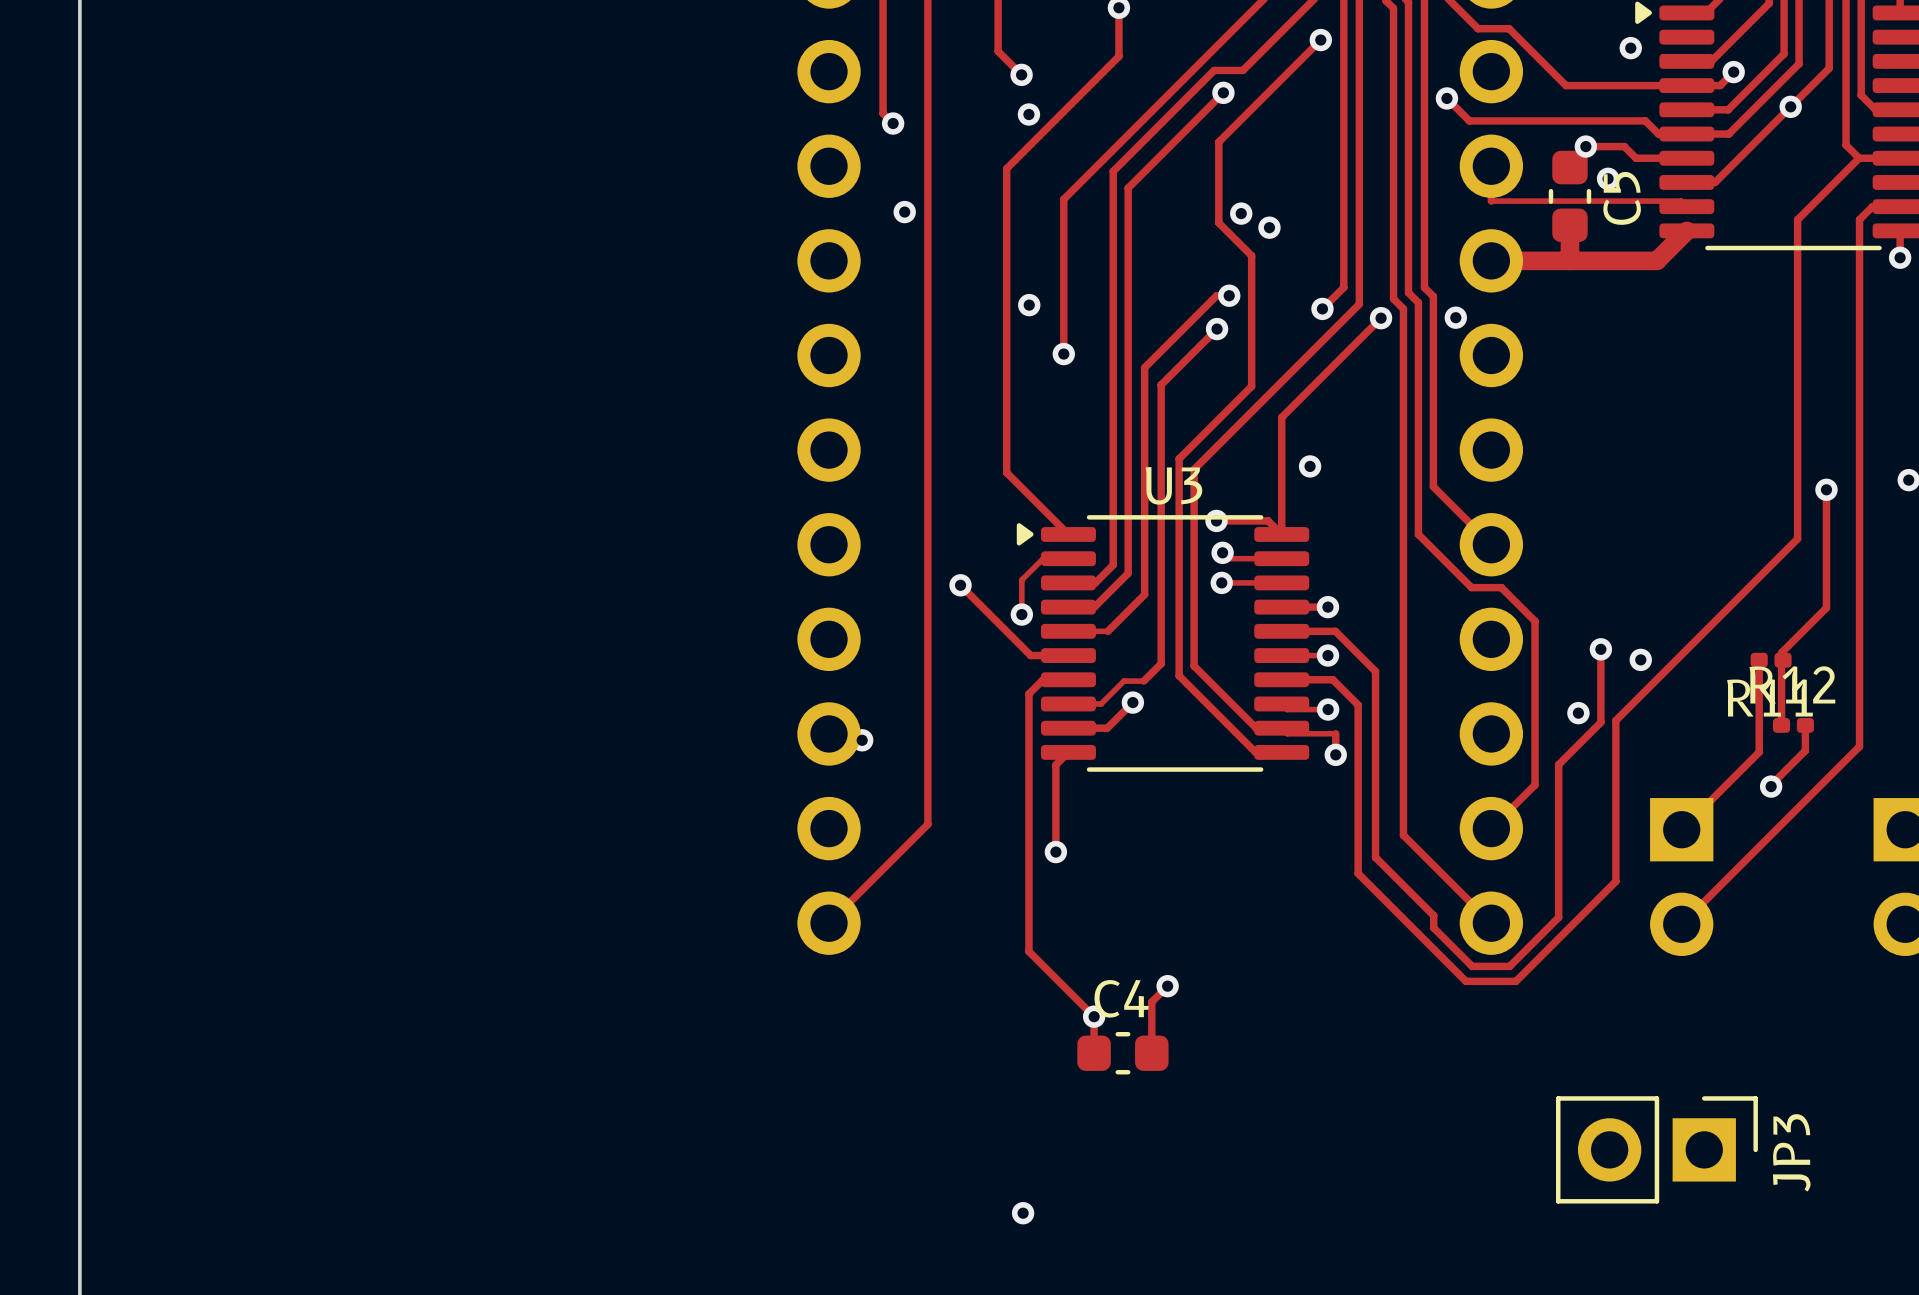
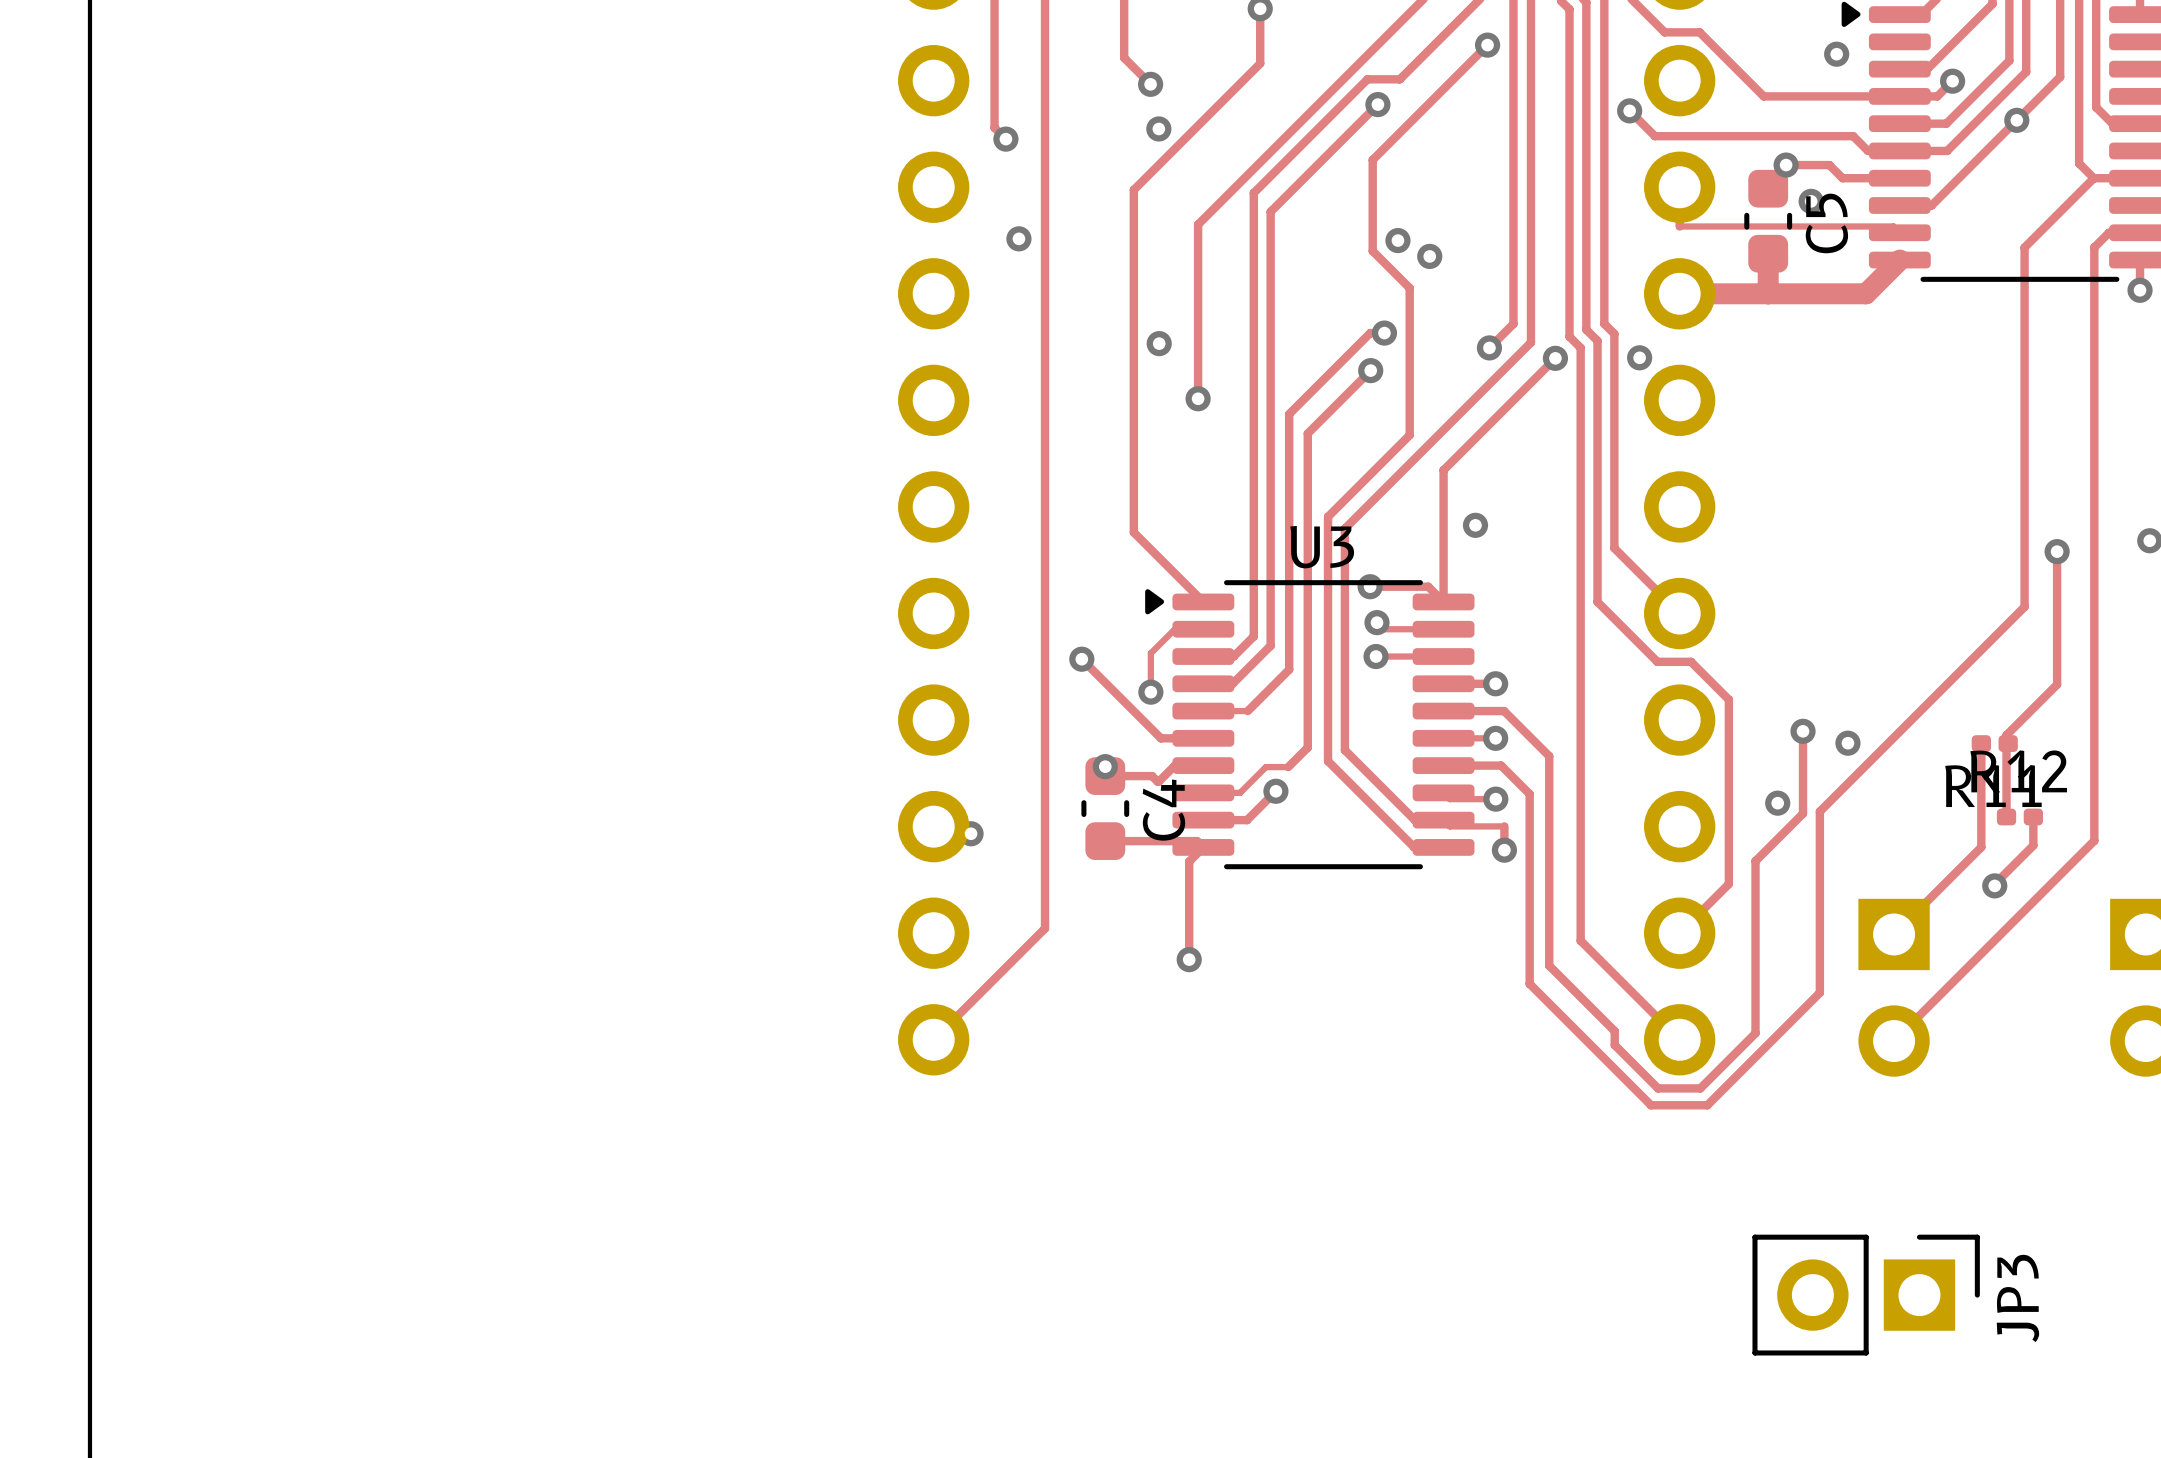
via: none -> (1105, 766)
track: (1028, 693) (1028, 951) (1094, 1016) (1094, 1053) -> (1158, 781) (1152, 776) (1105, 776)
track: none -> (1105, 841) (1197, 841) (1203, 847)
track: (1167, 986) (1151, 1001) (1151, 1053) -> none
via: (1167, 986) -> none
via: (1094, 1016) -> none
C4 rotation: 0° (1122, 1053) -> 90° clockwise (1105, 808)
C4 position: (1122, 1053) -> (1105, 808)
via: (1023, 1213) -> none

